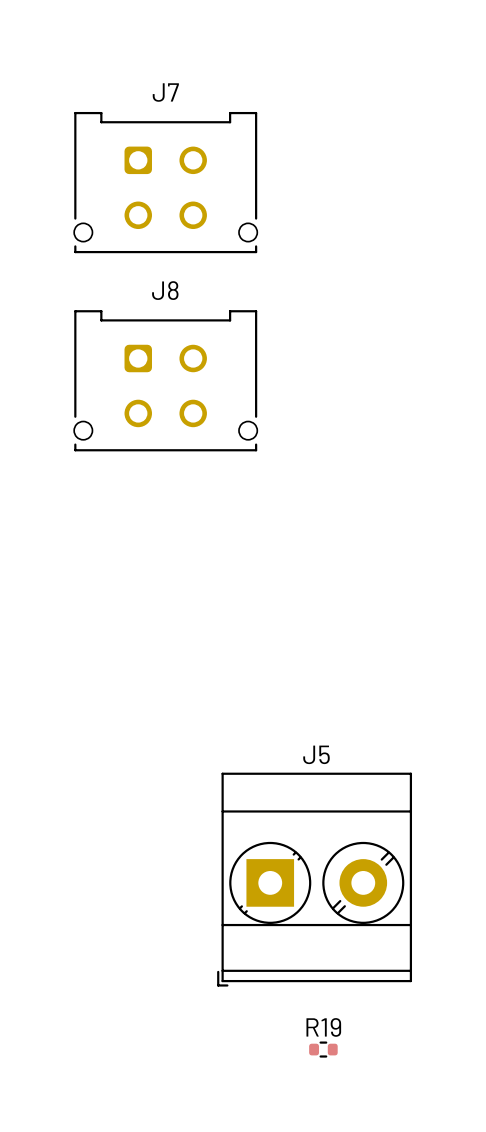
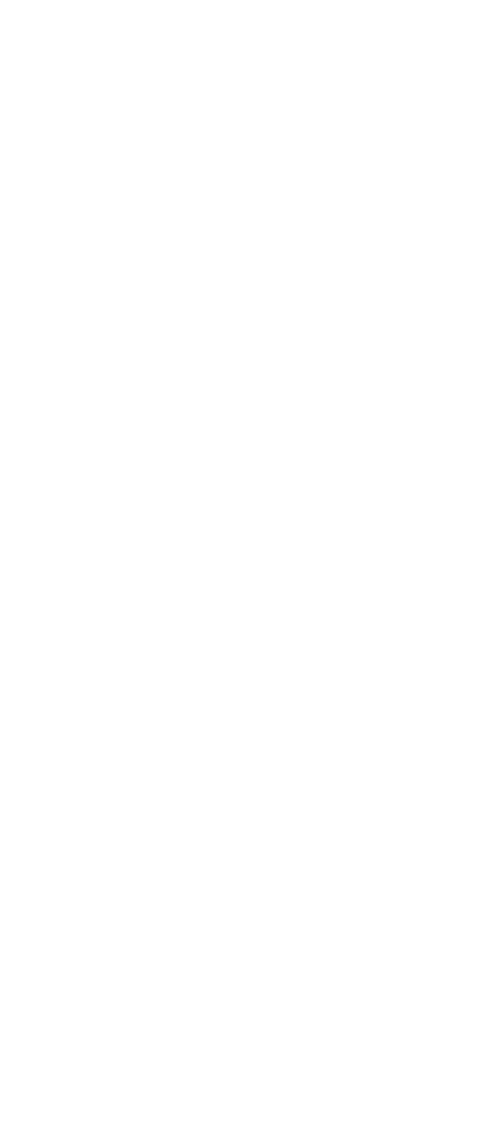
J7: (165, 182) -> none
J8: (165, 380) -> none
J5: (314, 879) -> none
R19: (323, 1049) -> none

